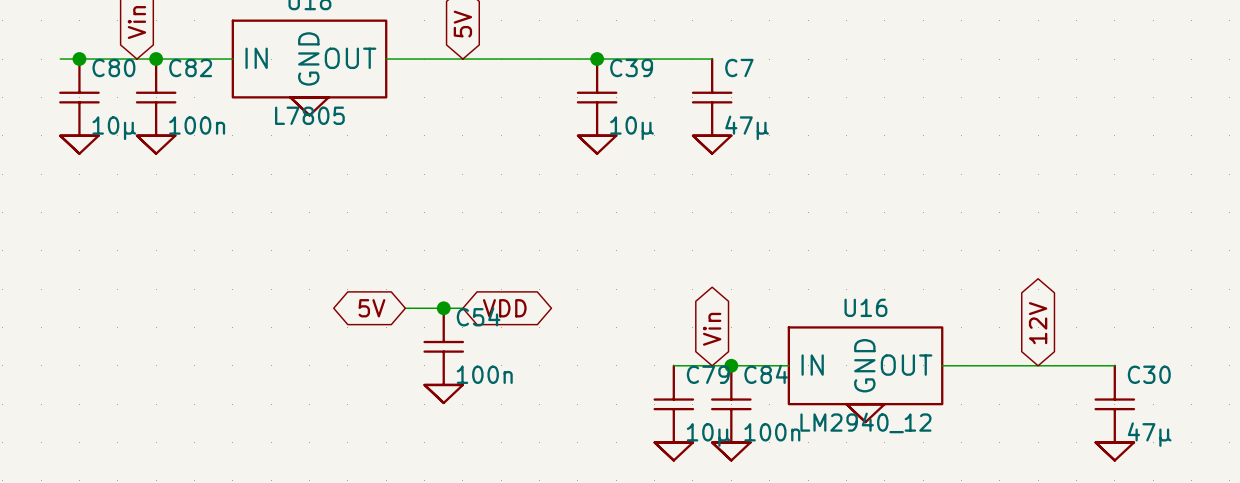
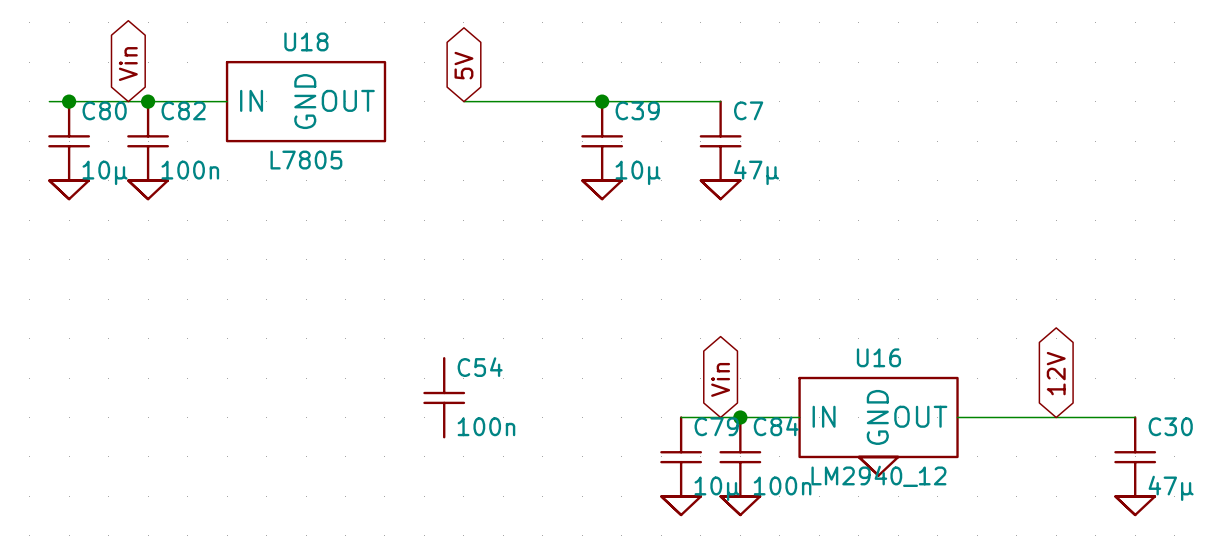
wire: (386, 59) (462, 59) -> none
power symbol: (309, 106) -> none
global label: 5V (371, 308) -> none
wire: (405, 308) (462, 308) -> none
junction: (443, 308) -> none
global label: VDD (504, 308) -> none
power symbol: (443, 393) -> none

